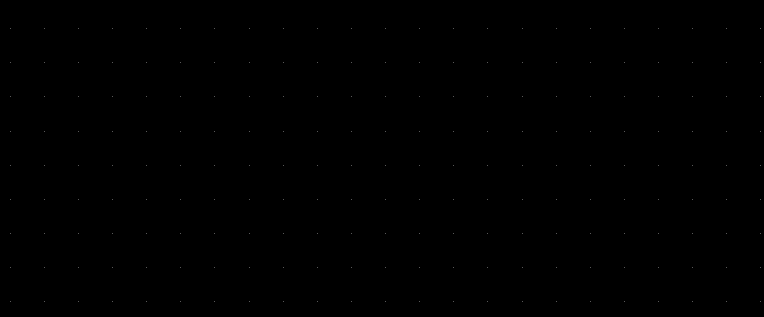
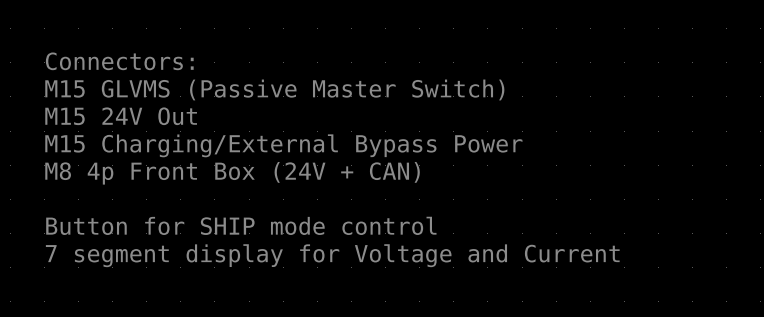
text: none -> Connectors: (119, 61)
text: none -> M15 GLVMS (Passive Master Switch) (274, 89)
text: none -> M15 24V Out (121, 116)
text: none -> M15 Charging/External Bypass Power (283, 145)
text: none -> M8 4p Front Box (24V + CAN) (232, 173)
text: none -> Button for SHIP mode control (241, 225)
text: none -> 7 segment display for Voltage and Current (332, 255)

